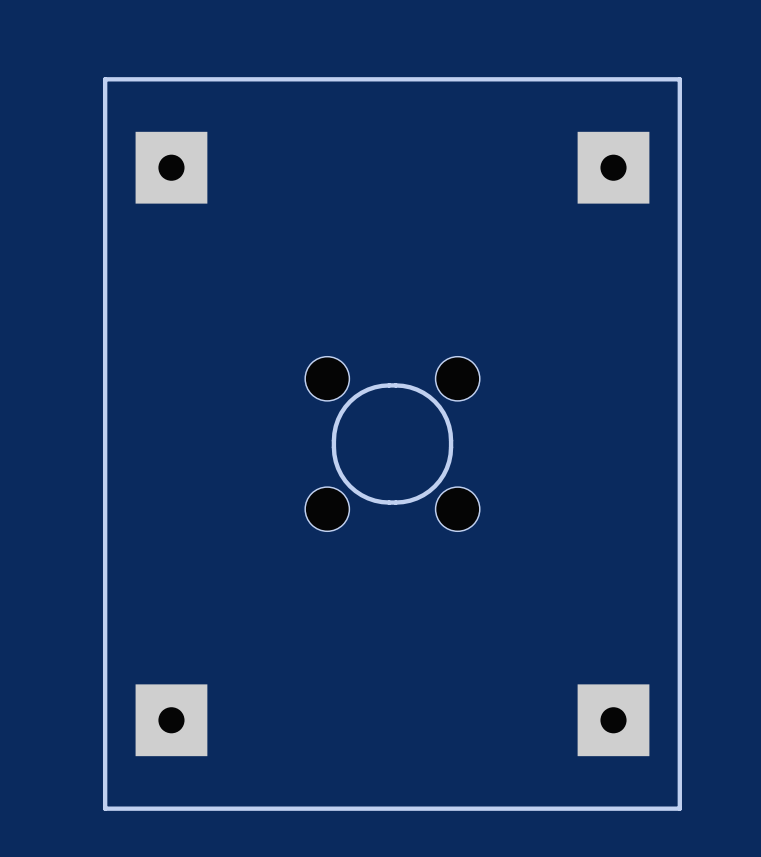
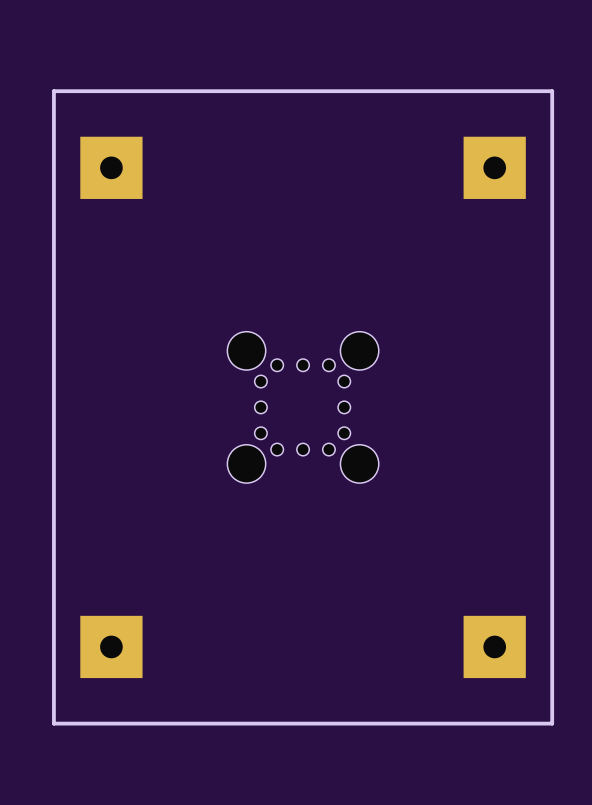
board edge: (395, 385) (374, 387) (355, 396) (341, 413) (334, 433) (335, 461) (345, 480) (361, 495) (381, 502) (410, 500) (429, 491) (443, 474) (450, 454) (449, 426) (439, 407) (423, 392) (410, 387) (395, 385) -> none
part: none -> (277, 365)
part: none -> (303, 365)
part: none -> (328, 365)
part: none -> (260, 381)
part: none -> (344, 381)
part: none -> (260, 407)
part: none -> (344, 407)
part: none -> (260, 433)
part: none -> (344, 433)
part: none -> (277, 449)
part: none -> (303, 449)
part: none -> (328, 449)

